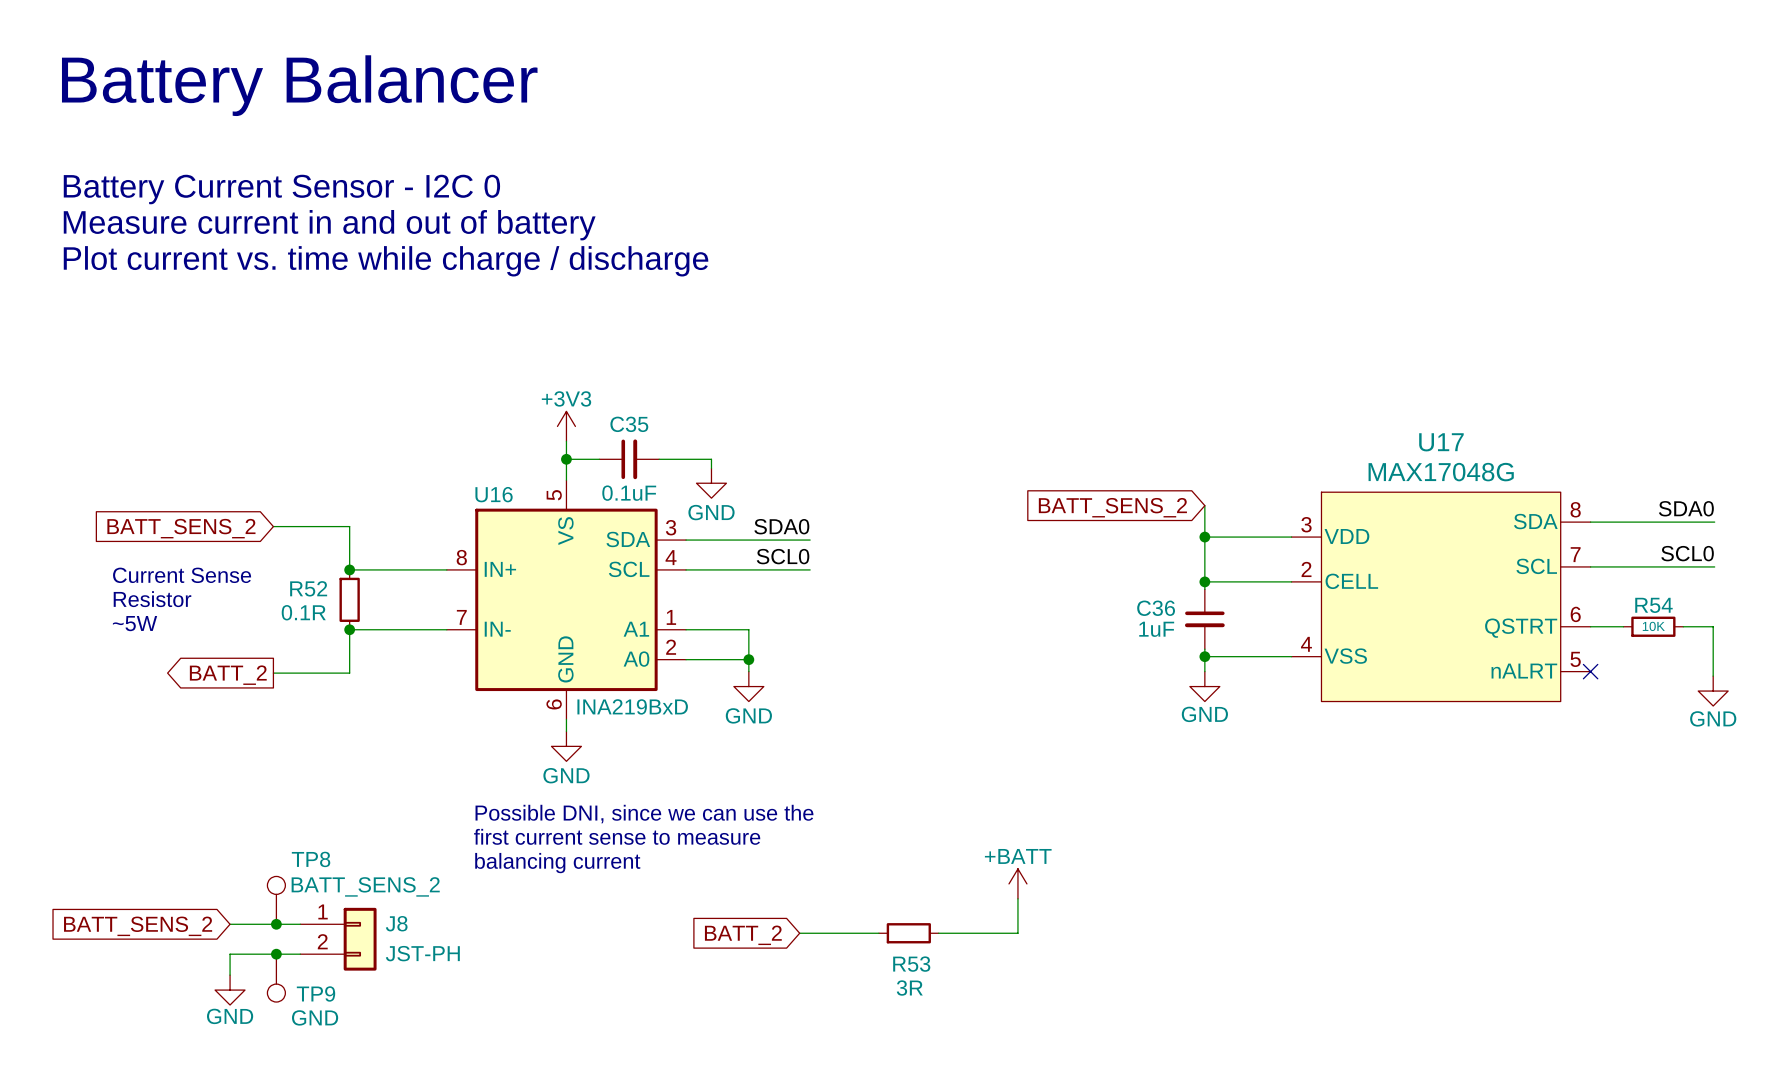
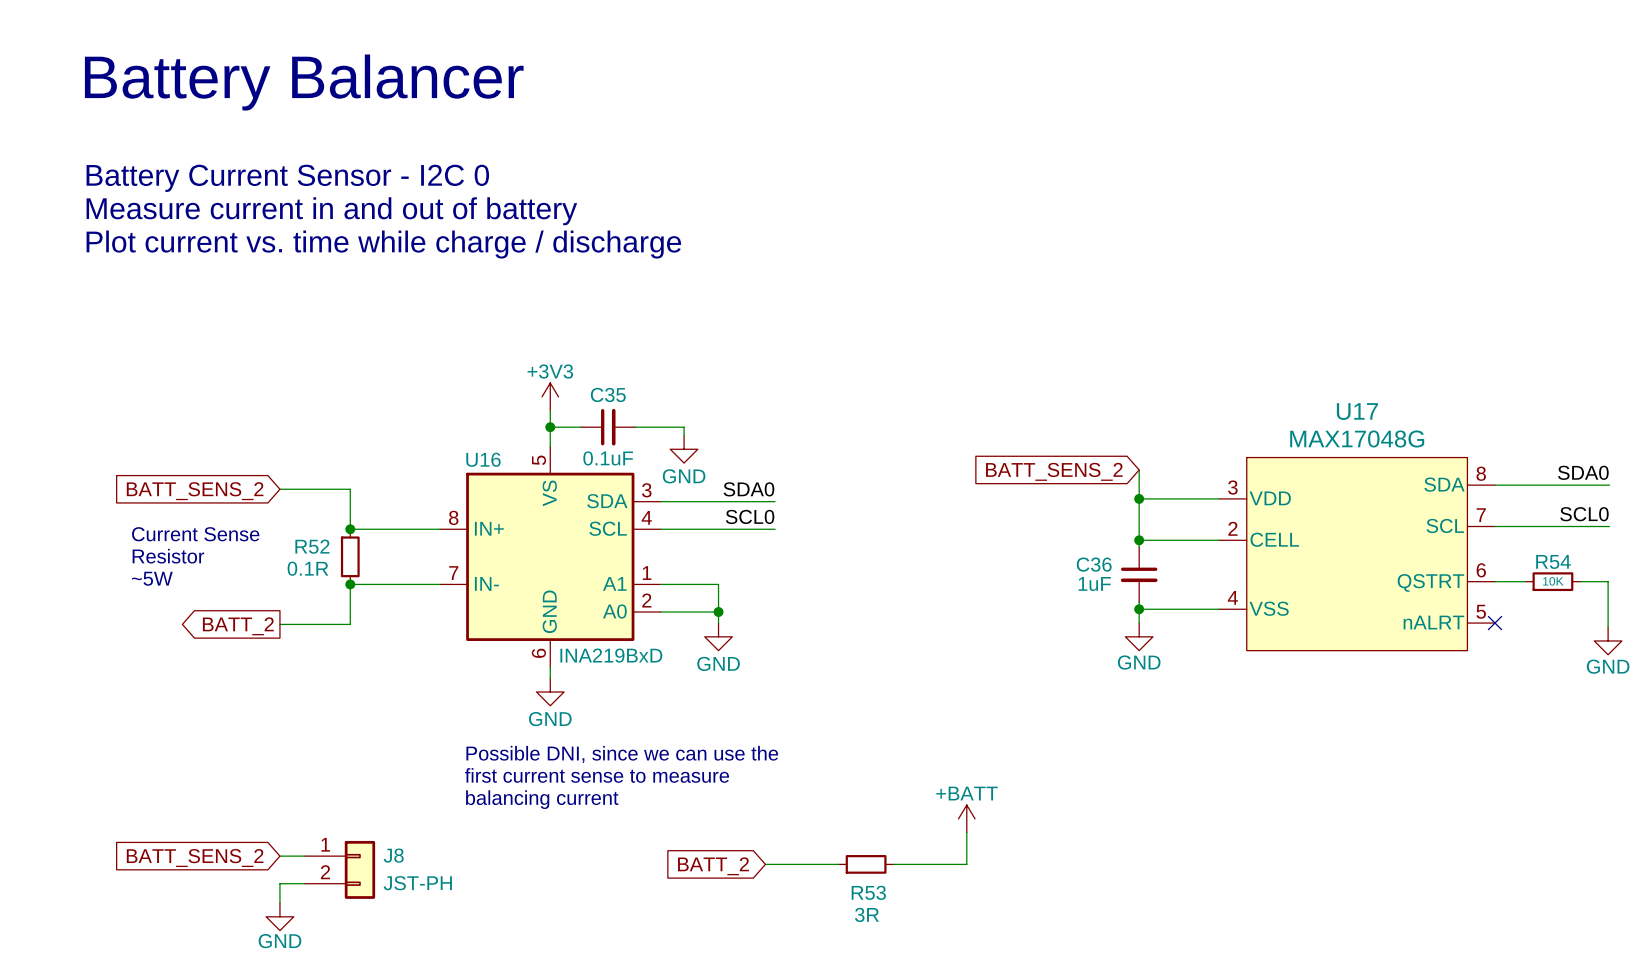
TP8: BATT_SENS_2 (276, 900) -> none
wire: (230, 924) (273, 924) -> none
junction: (276, 924) -> none
global label position: BATT_SENS_2 (138, 926) -> BATT_SENS_2 (195, 858)
wire: (273, 954) (230, 954) (230, 975) -> (279, 883) (279, 903)
junction: (276, 954) -> none
TP9: GND (276, 978) -> none
power symbol position: GND (230, 990) -> GND (279, 916)

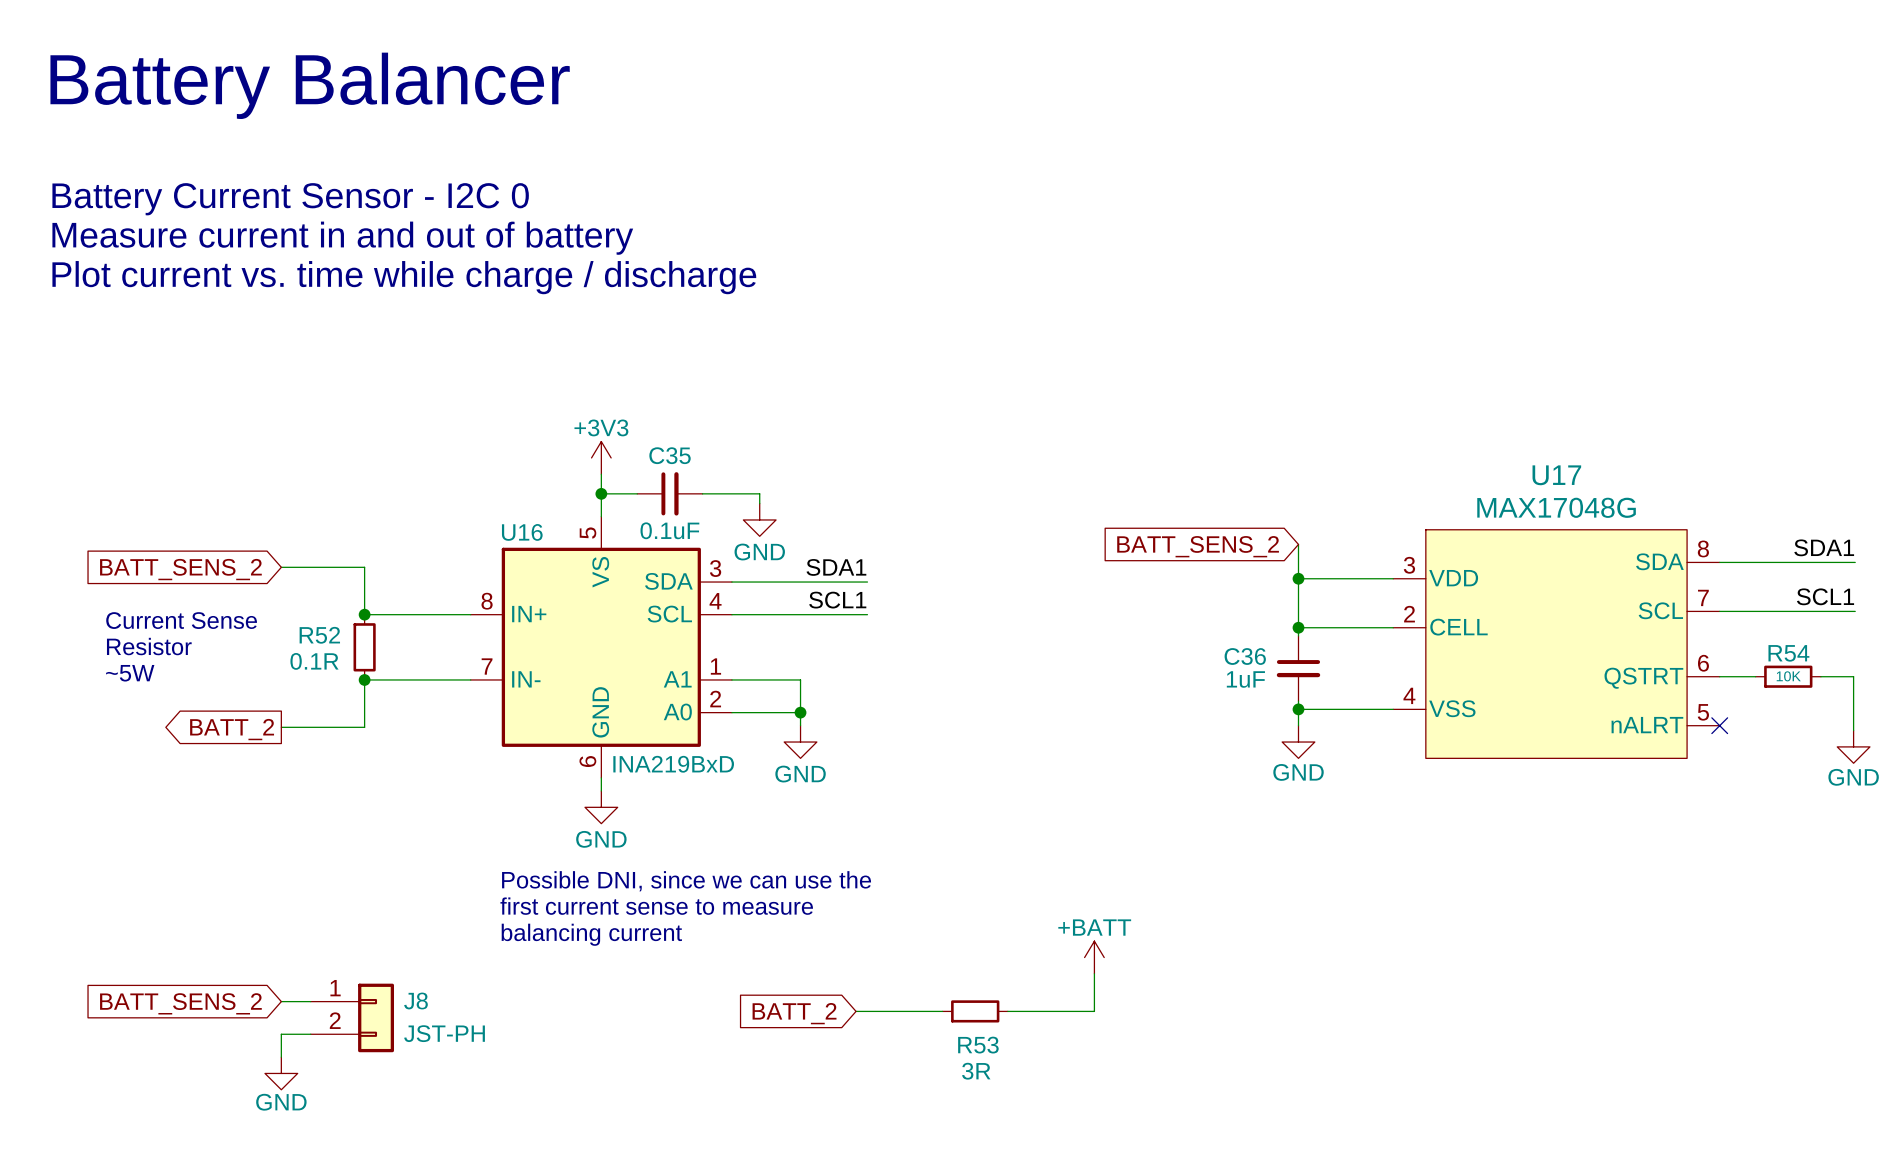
label: SDA0 (1583, 472) -> SDA1 (1824, 547)
label: SDA0 (748, 489) -> SDA1 (836, 567)
label: SCL0 (1584, 514) -> SCL1 (1825, 596)
label: SCL0 (750, 516) -> SCL1 (837, 600)

